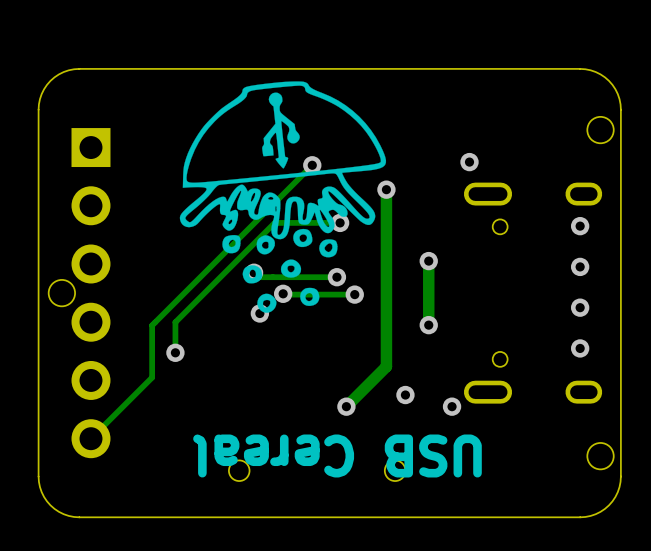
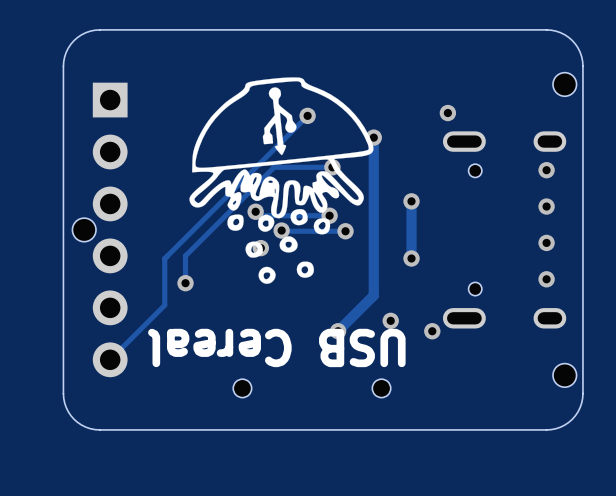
drawing position: (282, 197) -> (281, 180)
text position: USB Cereal (337, 455) -> USB Cereal (276, 347)

